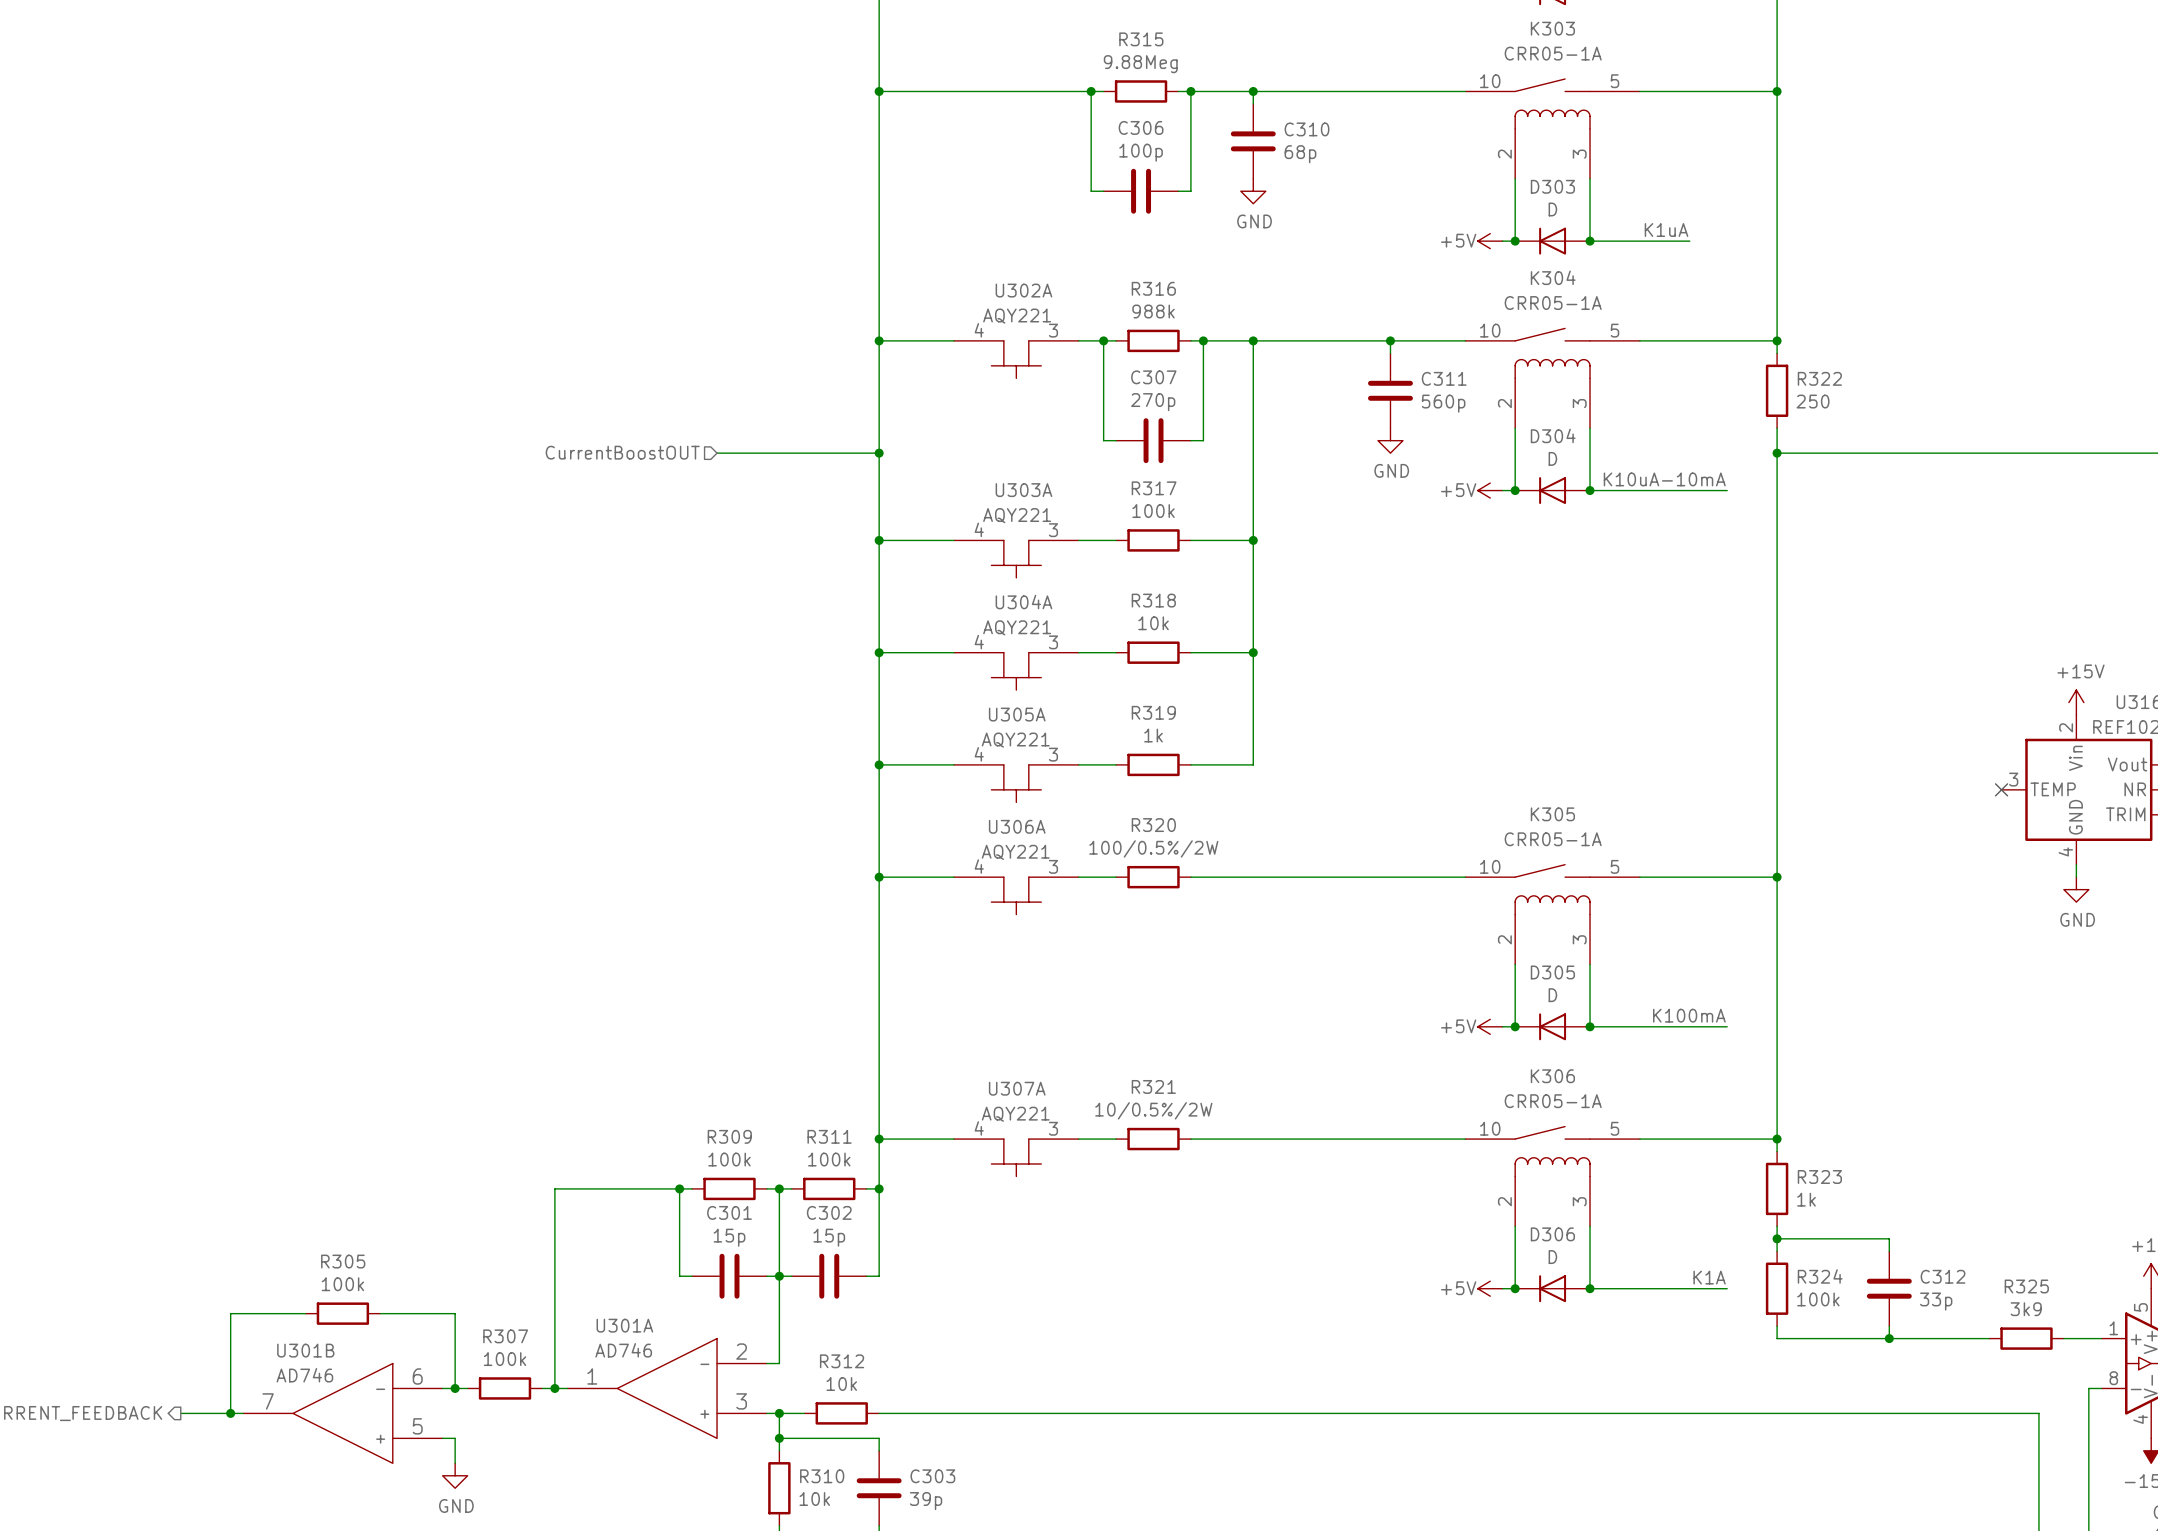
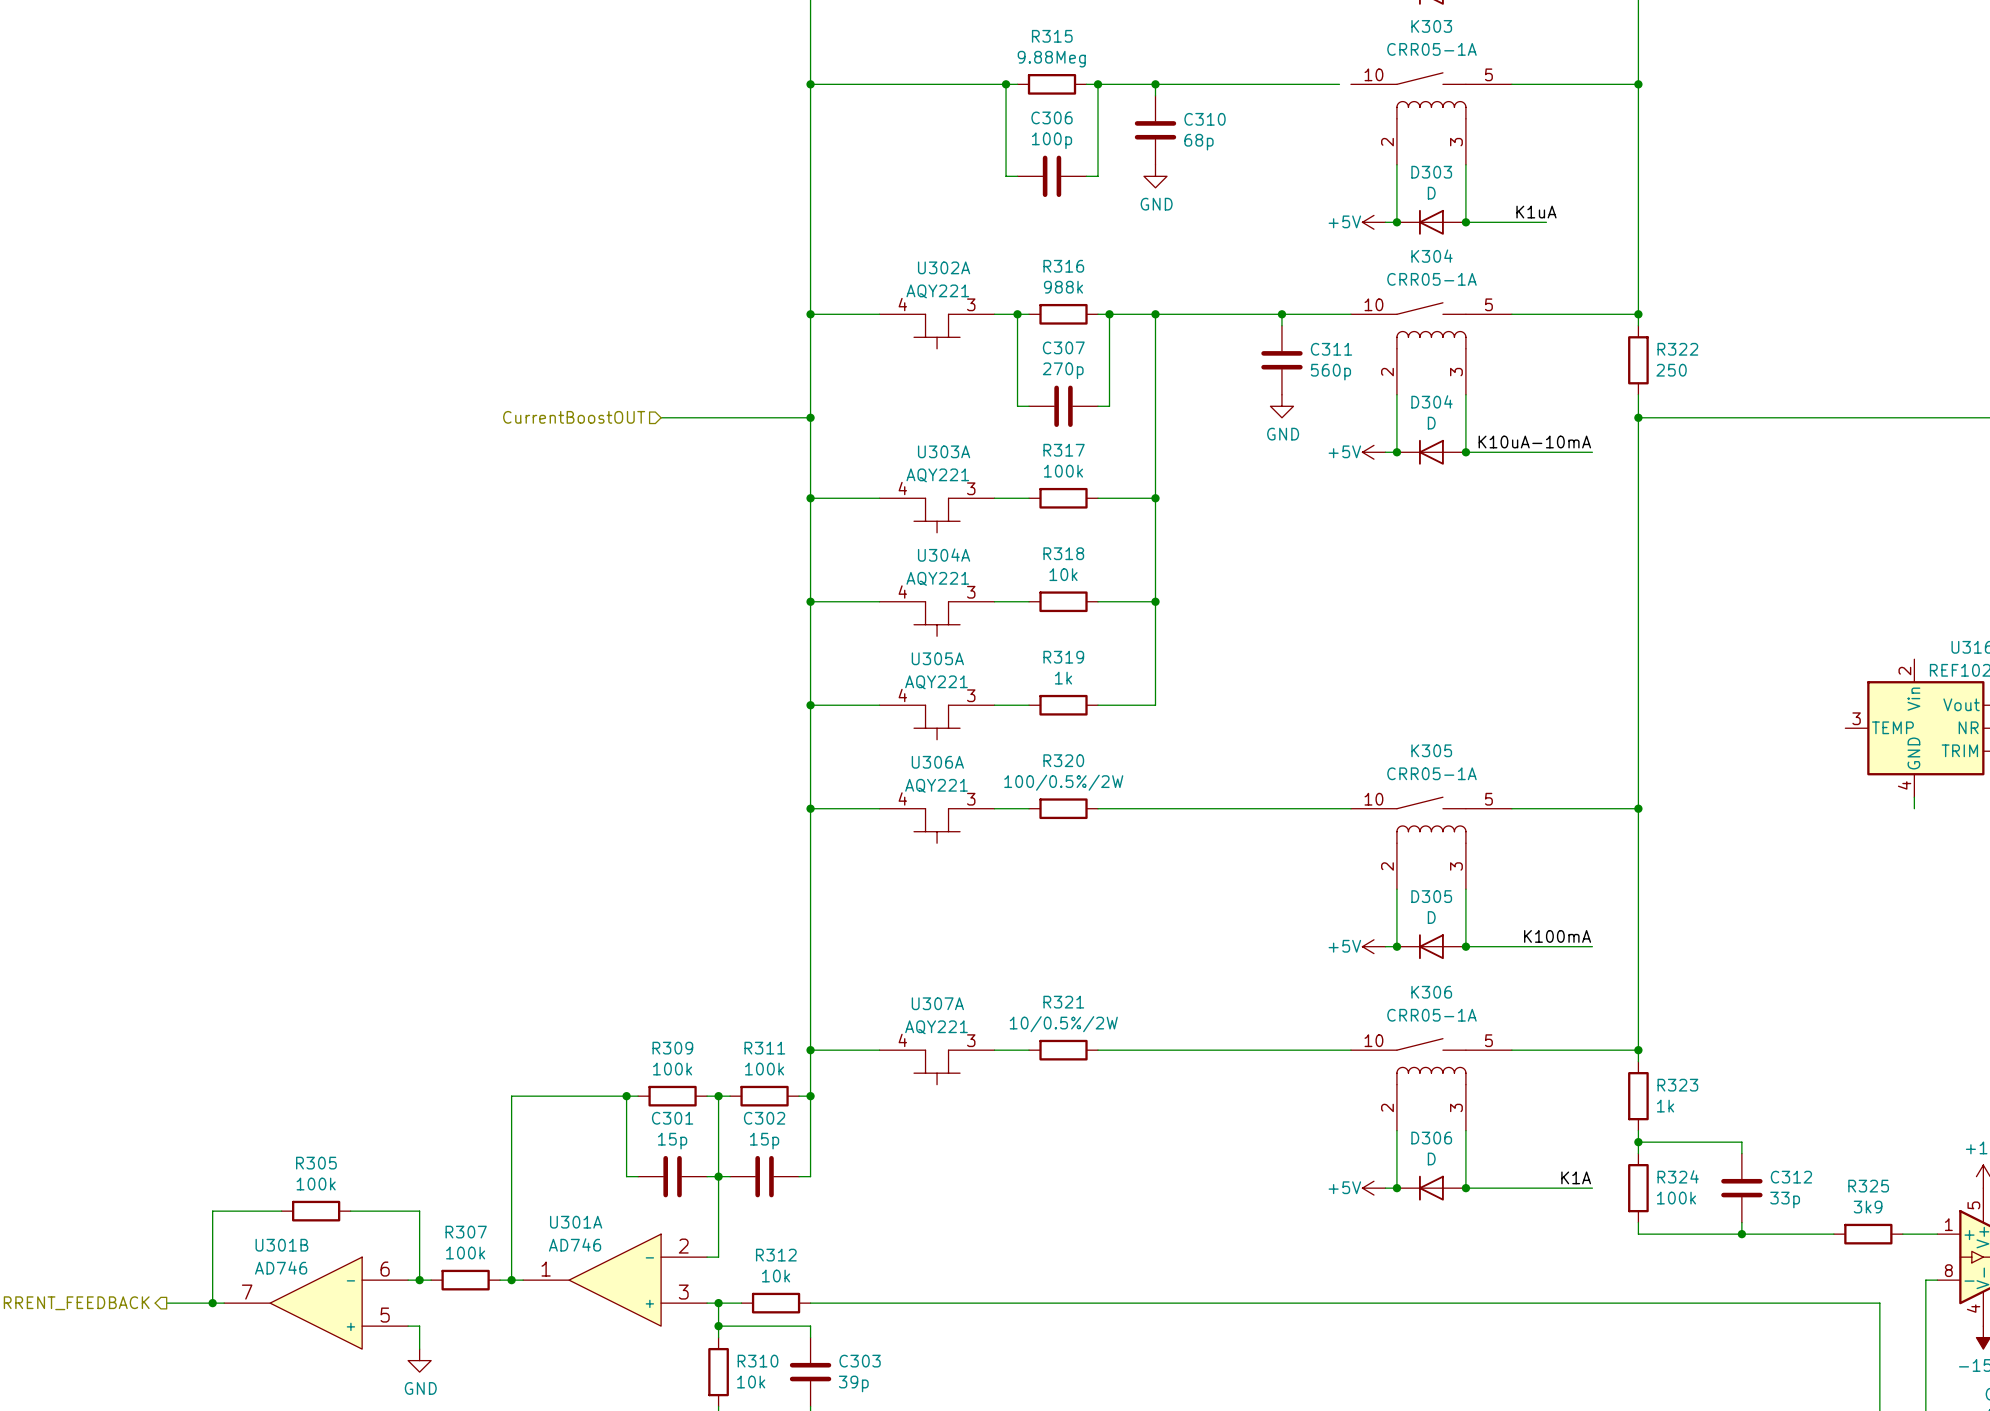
wire: (1452, 91) (1465, 91) -> none
wire: (1677, 241) (1689, 241) -> none
power symbol: +15V (2076, 702) -> none
no-connect mark: (2001, 789) -> none
power symbol: GND (2076, 889) -> none

